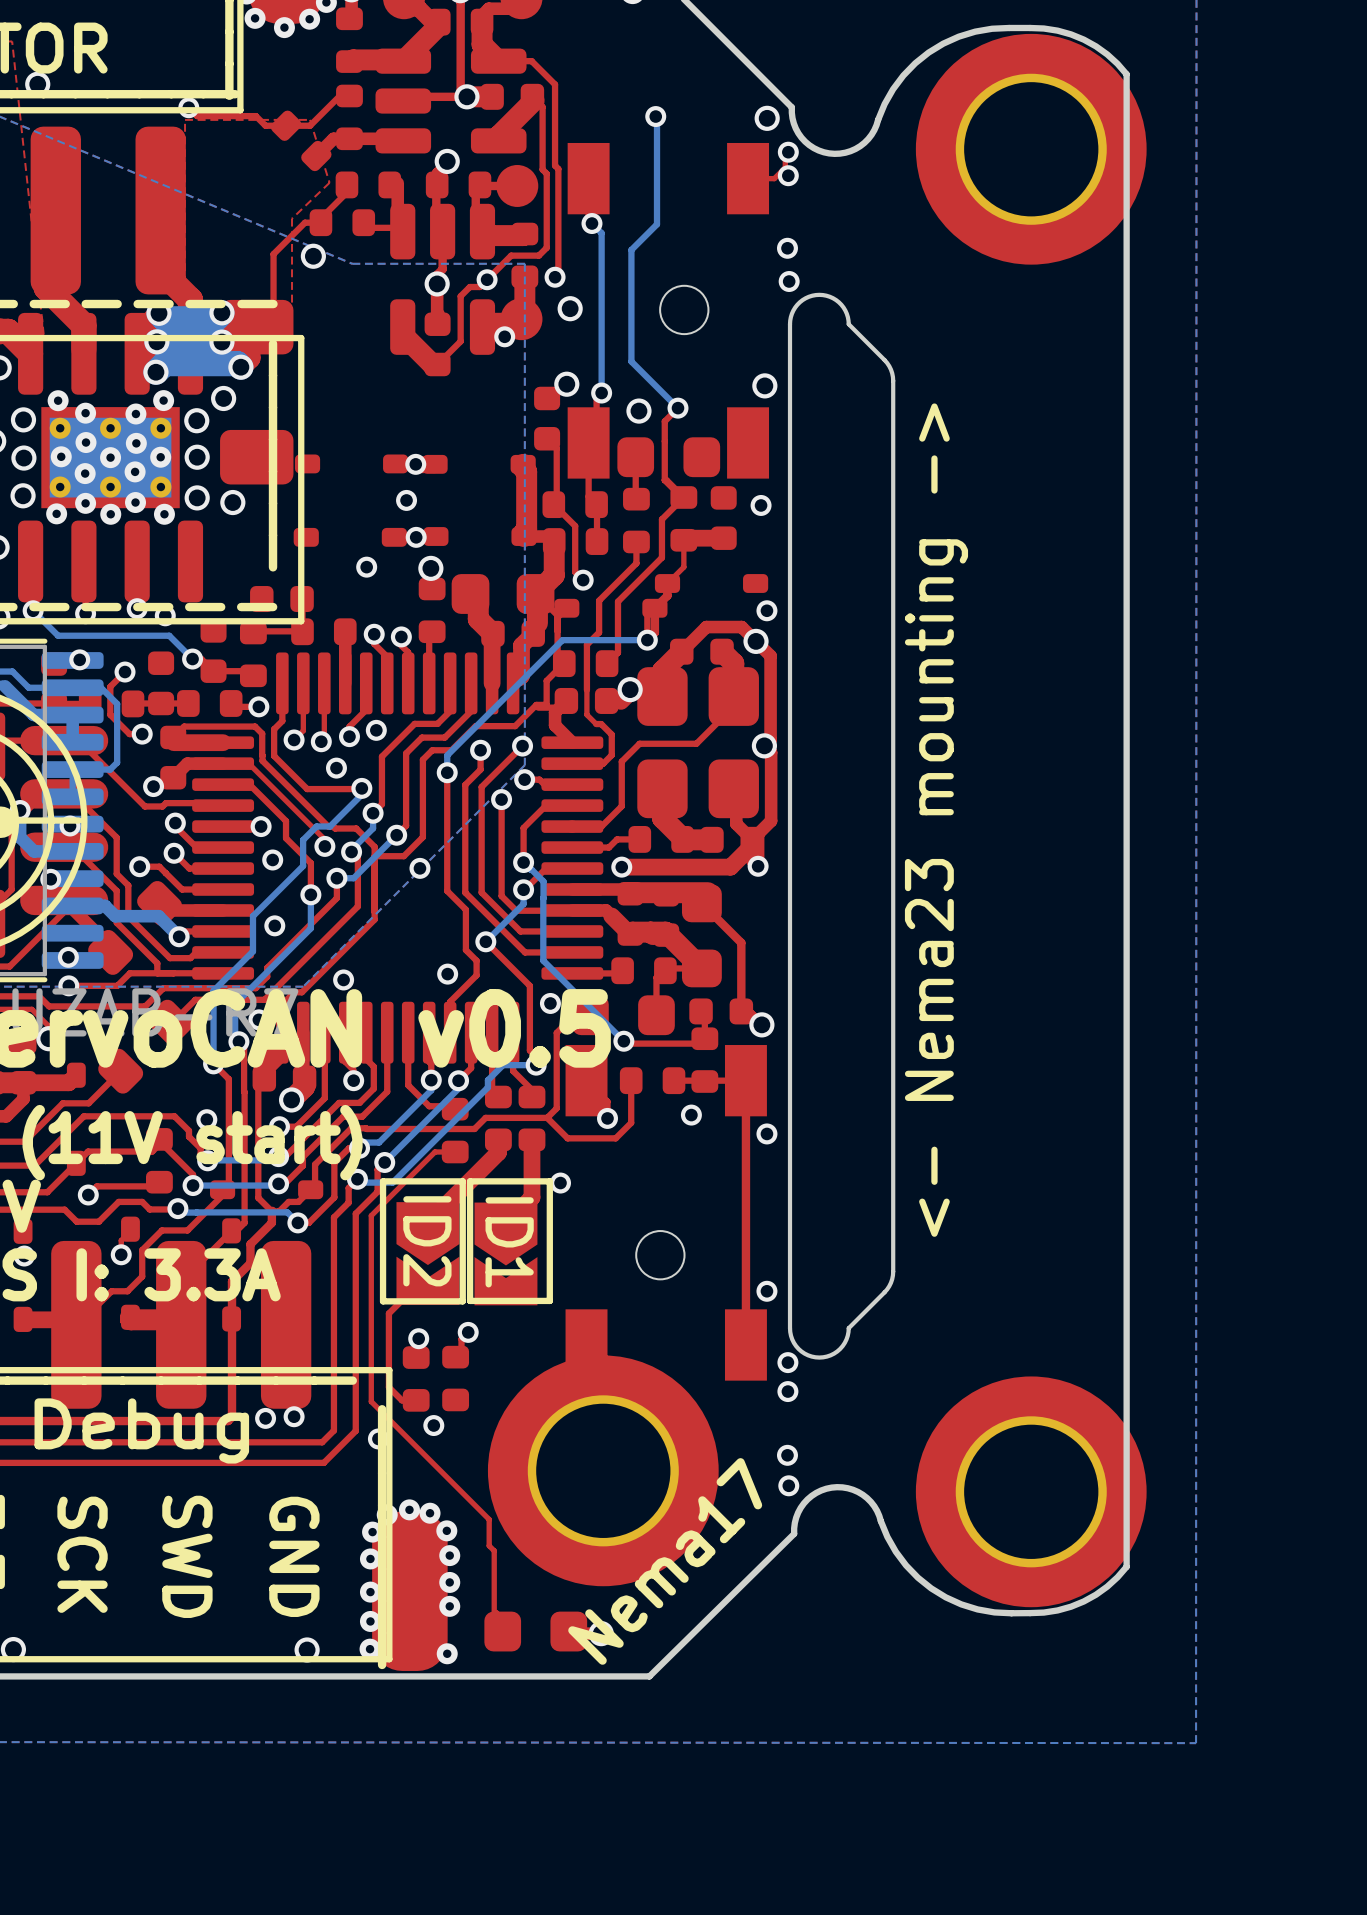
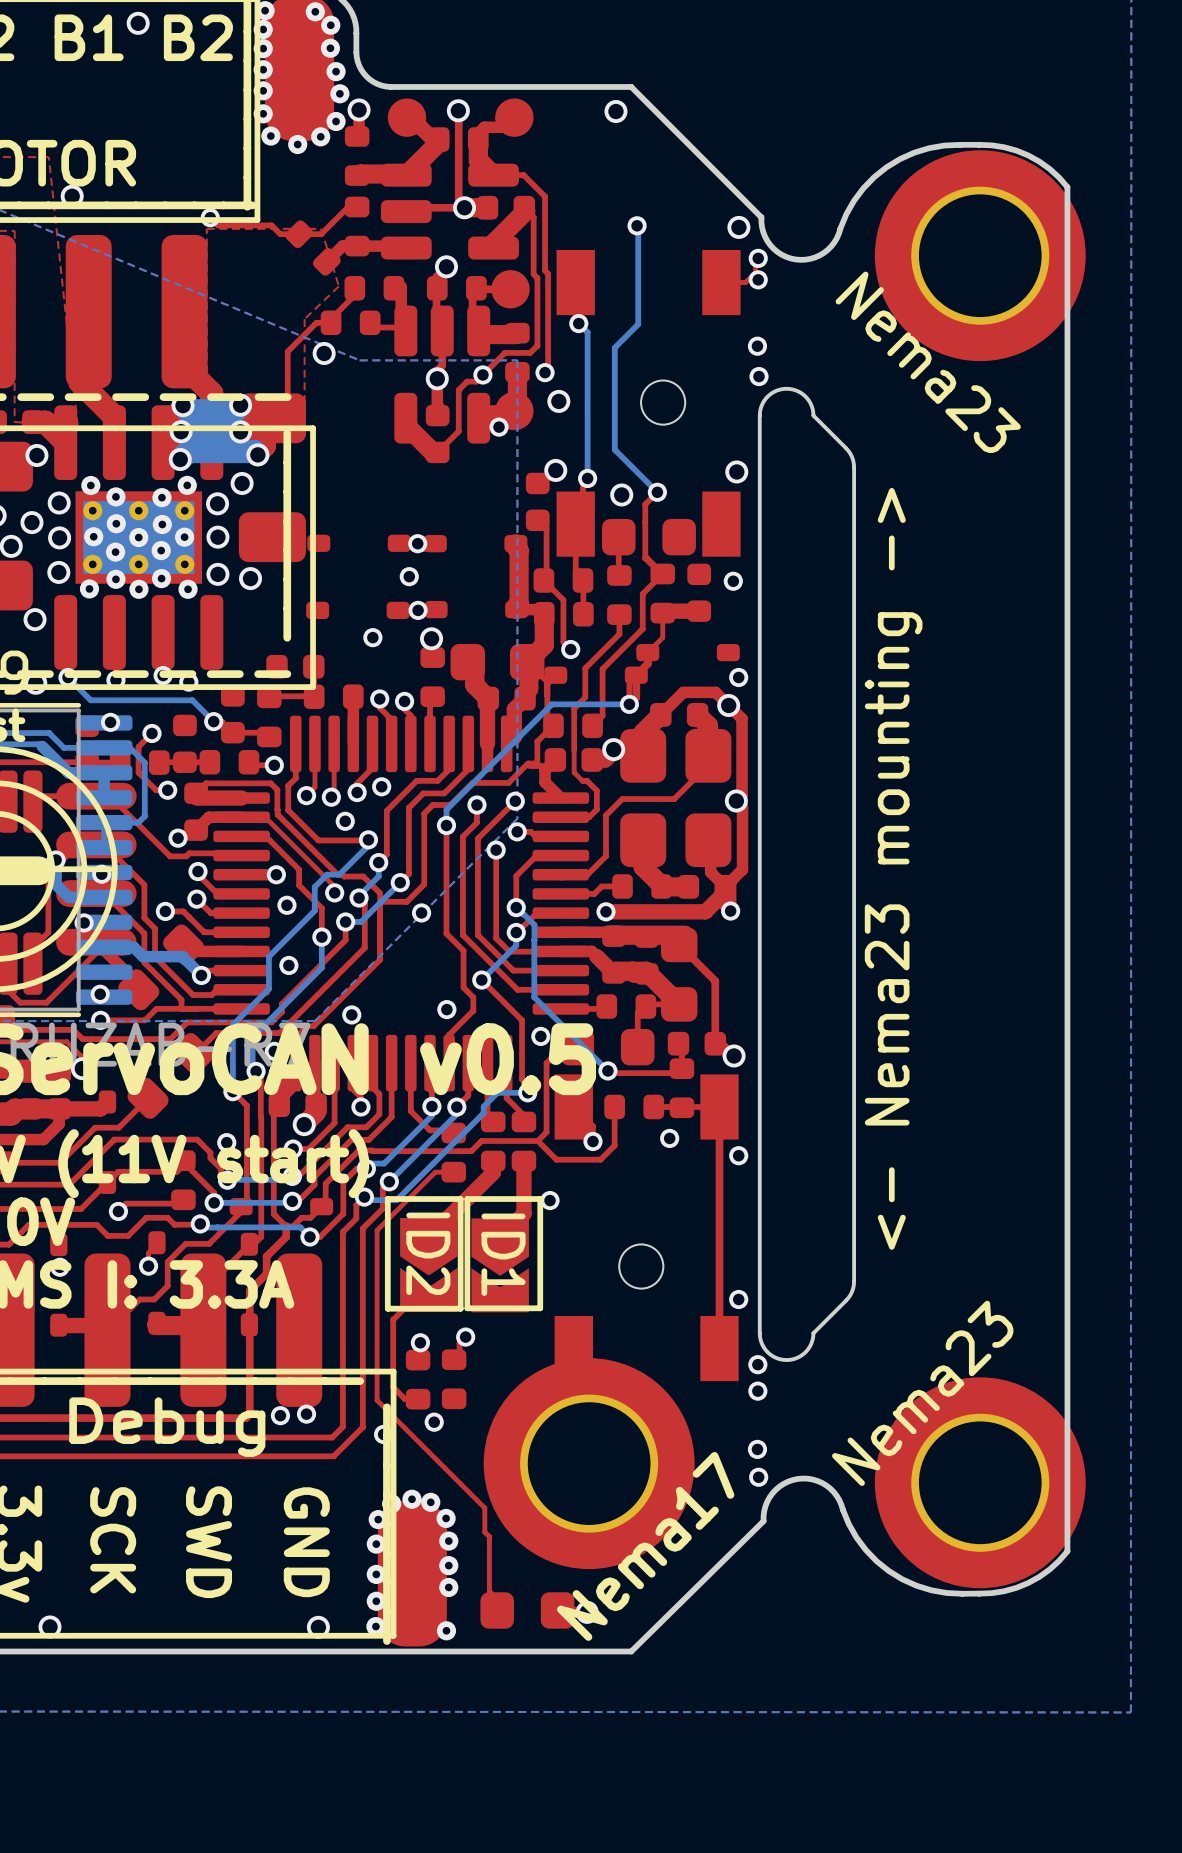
text: none -> Nema23 (928, 362)
text: none -> Nema23 (922, 1393)

